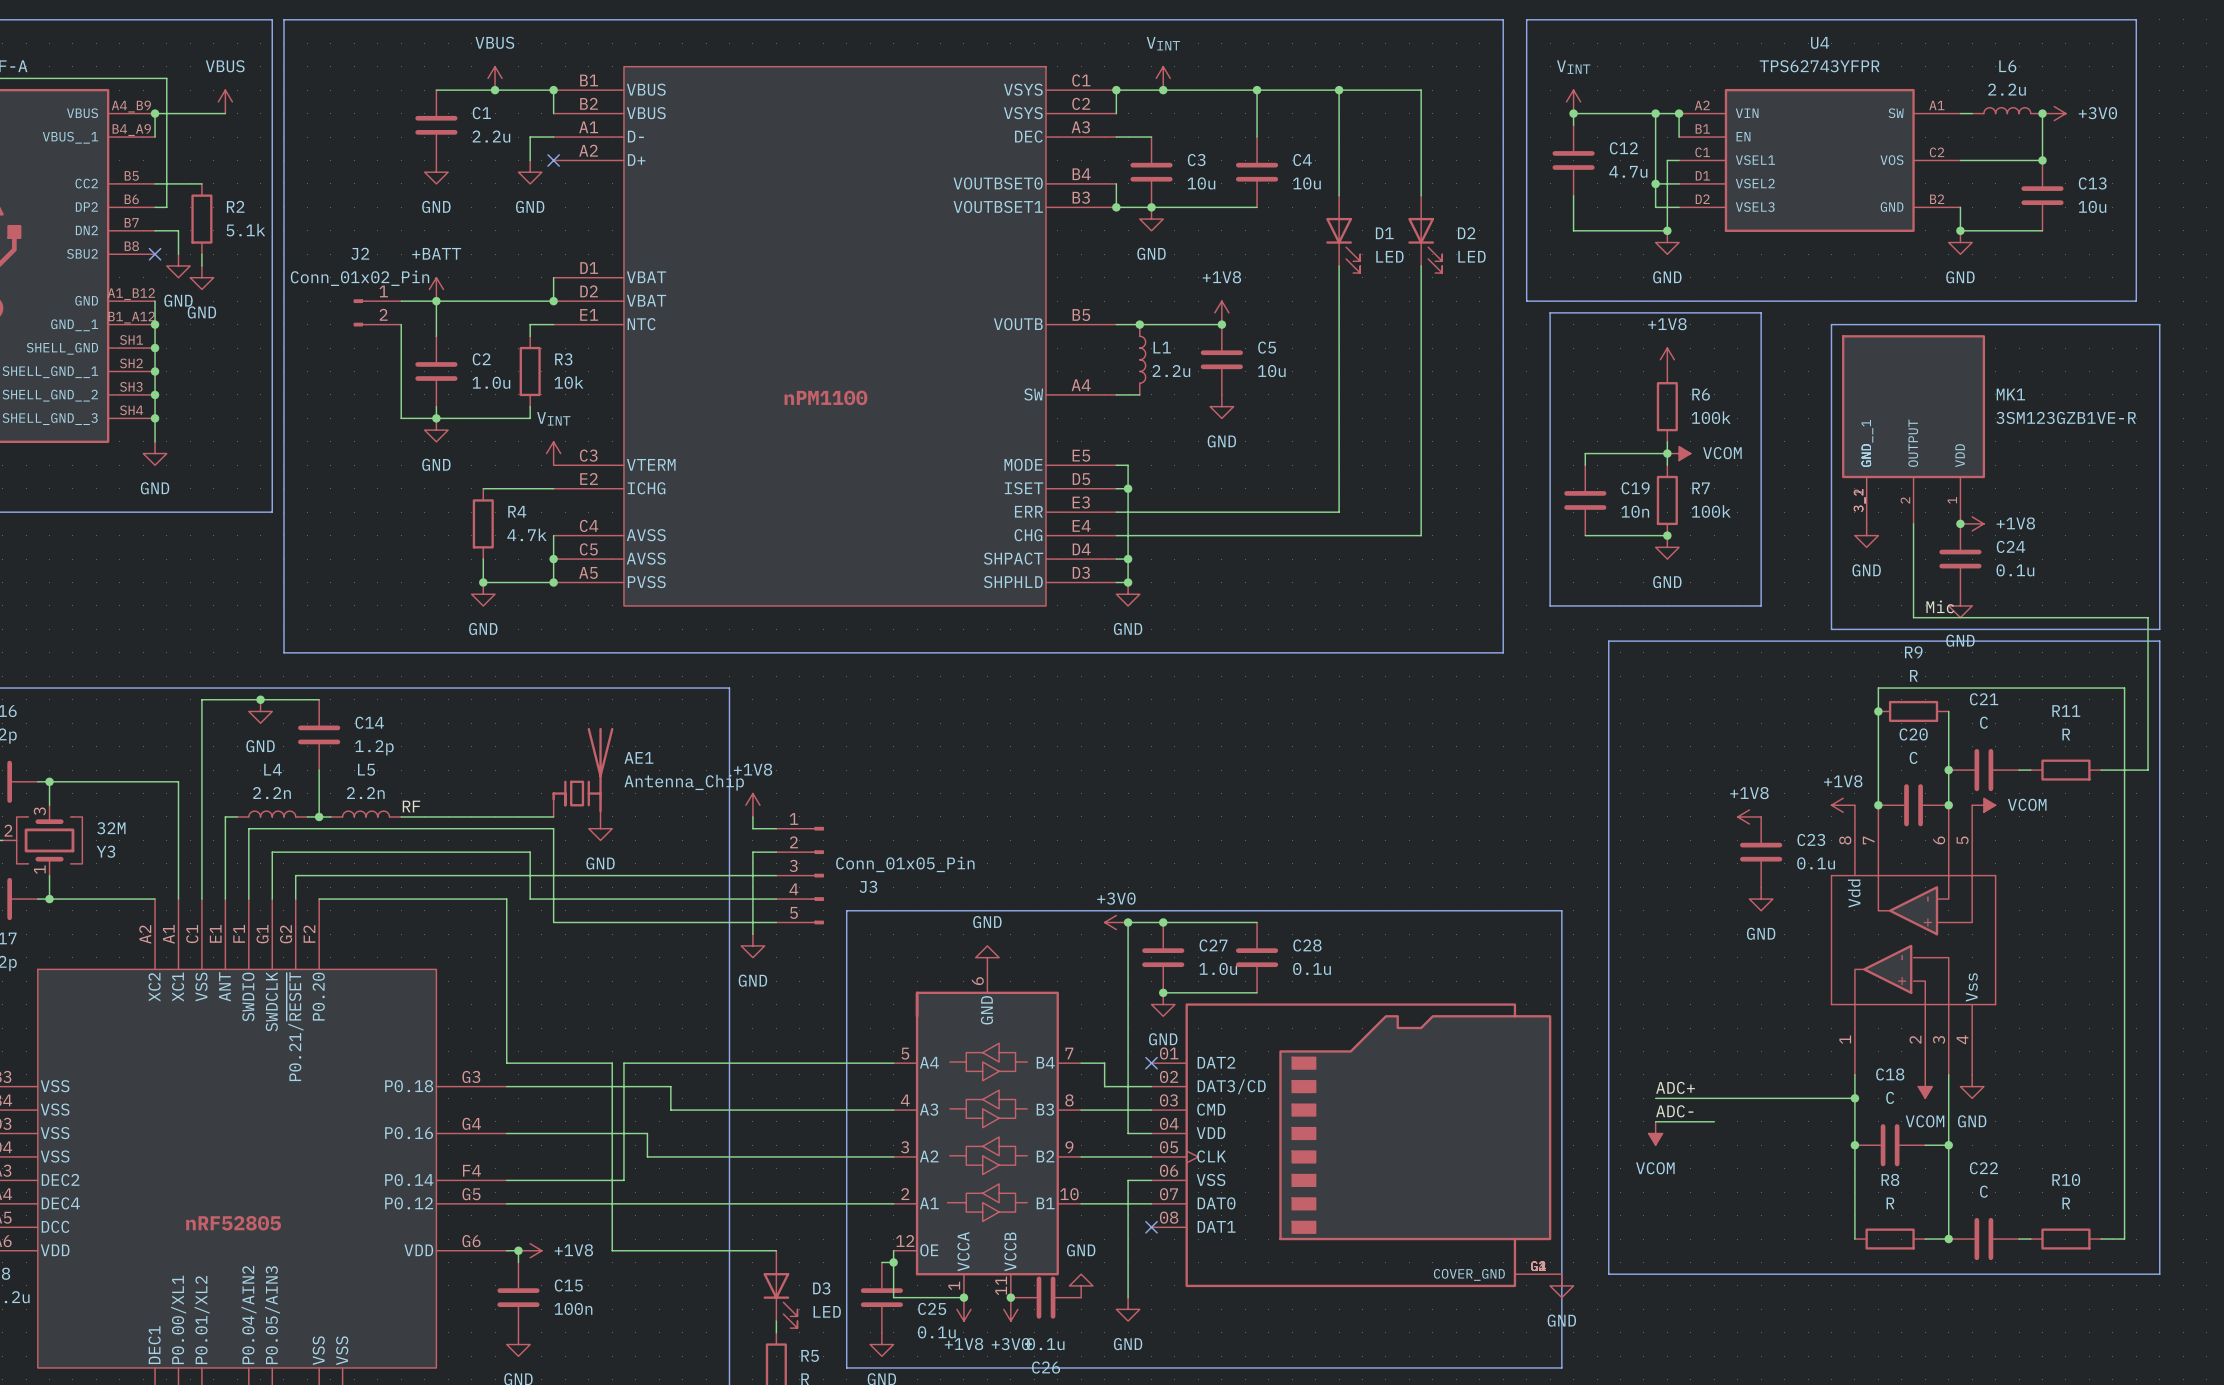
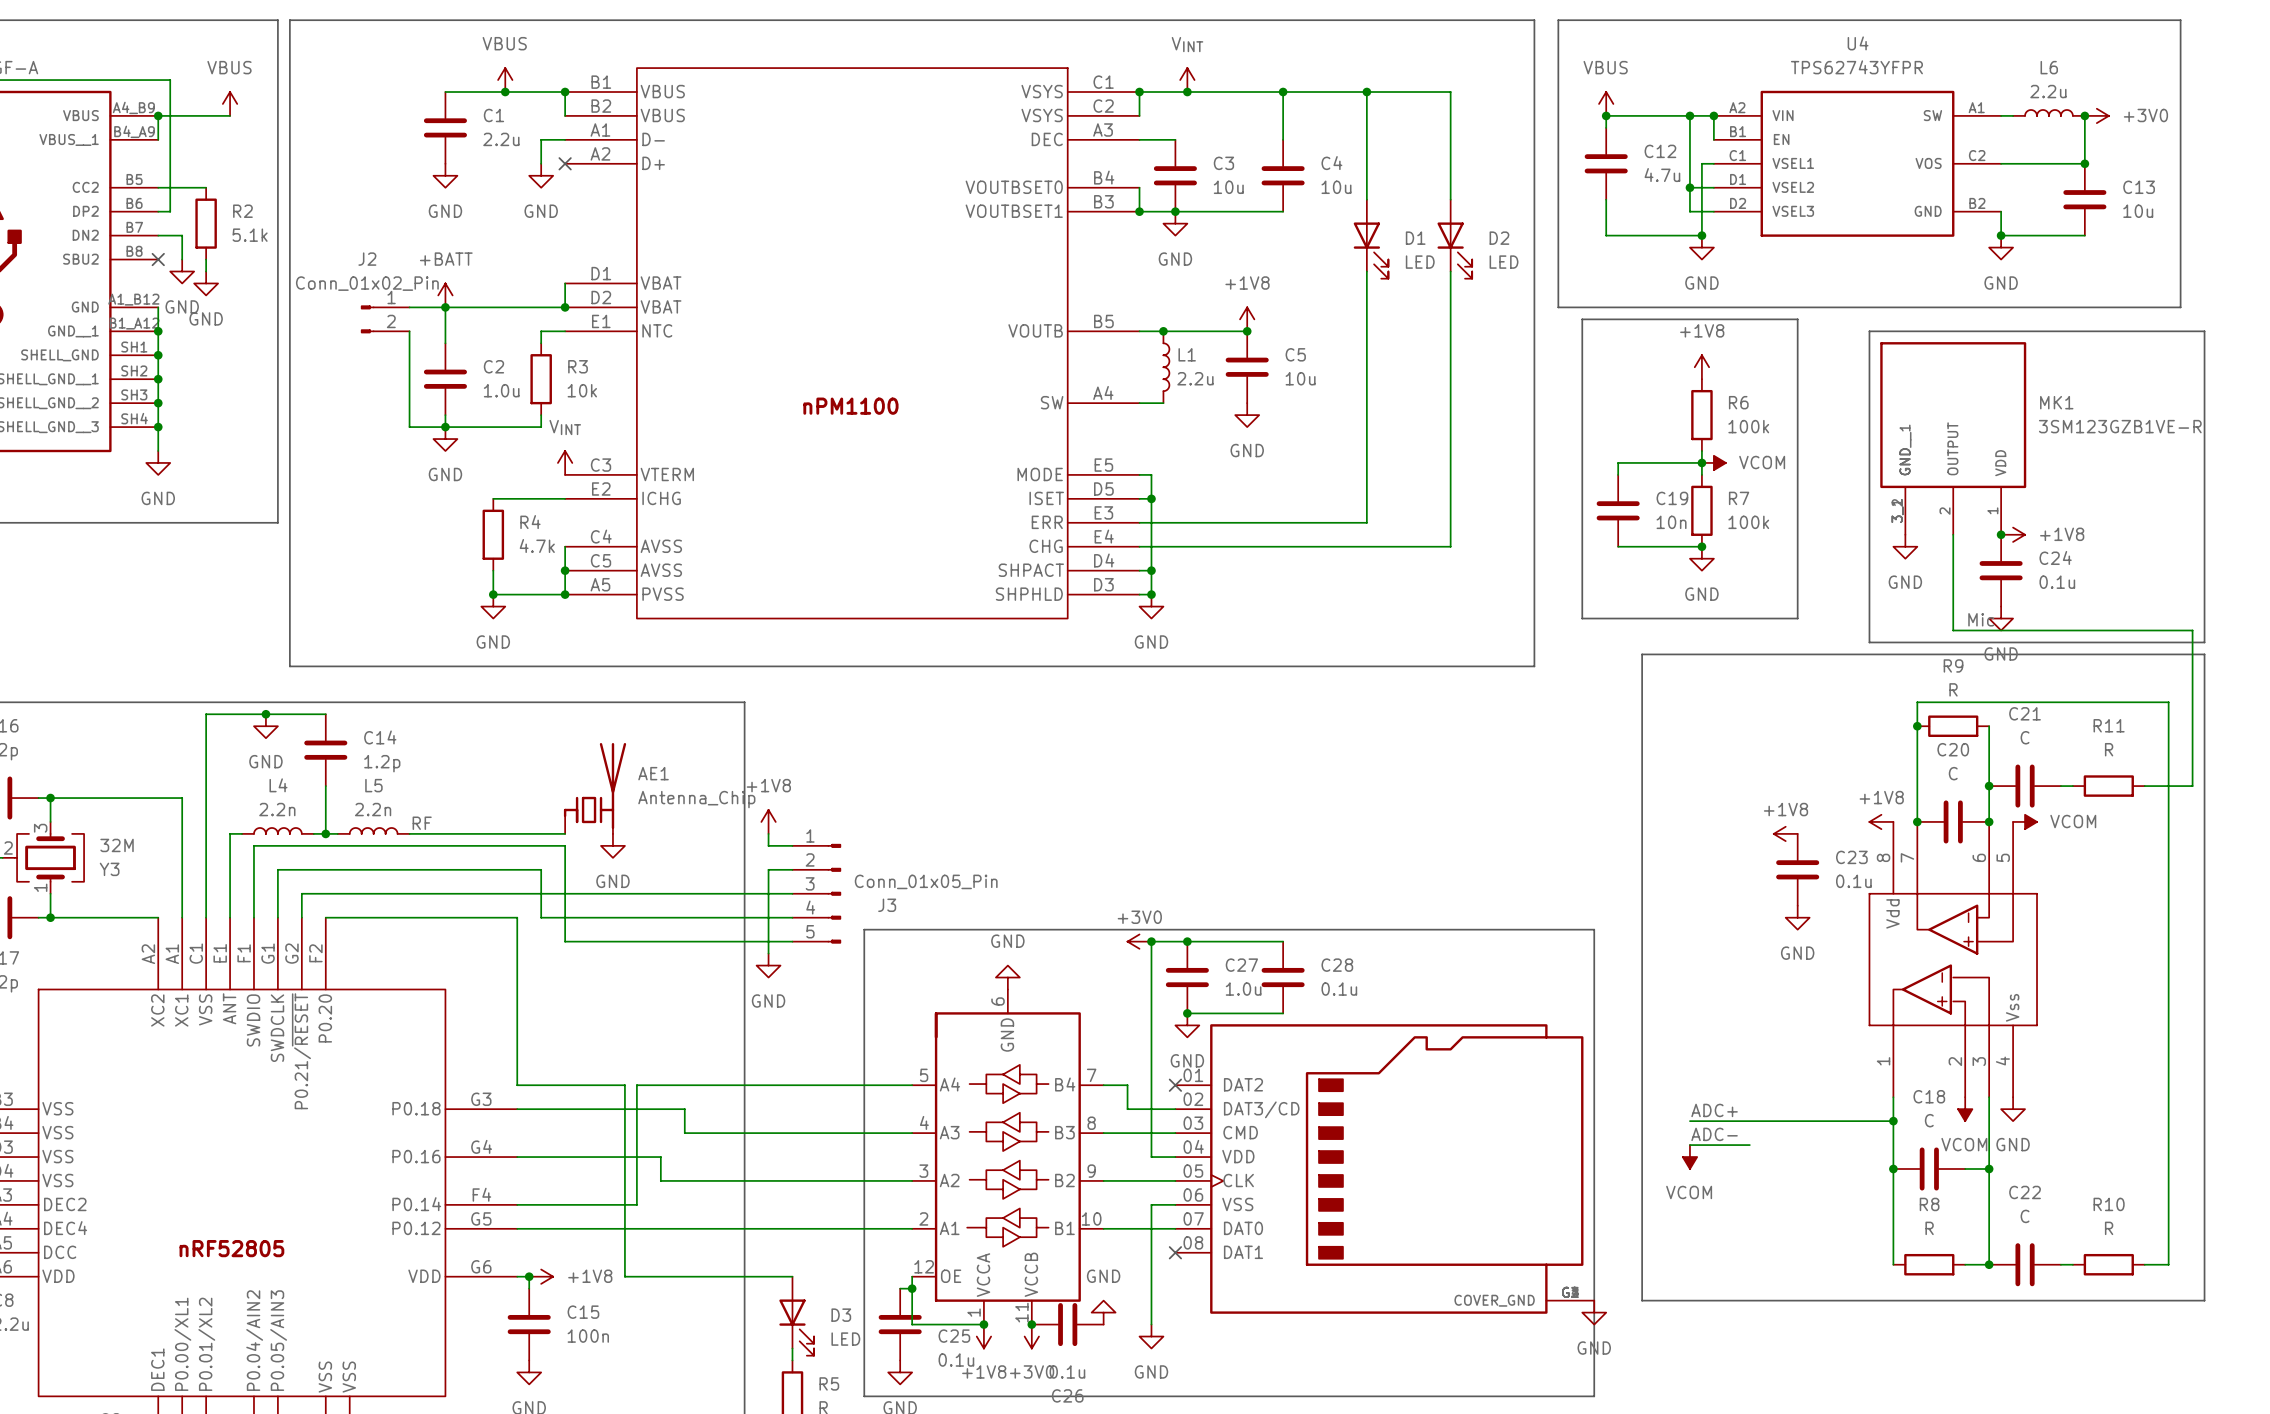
power symbol: VINT (1573, 101) -> VBUS (1606, 103)

